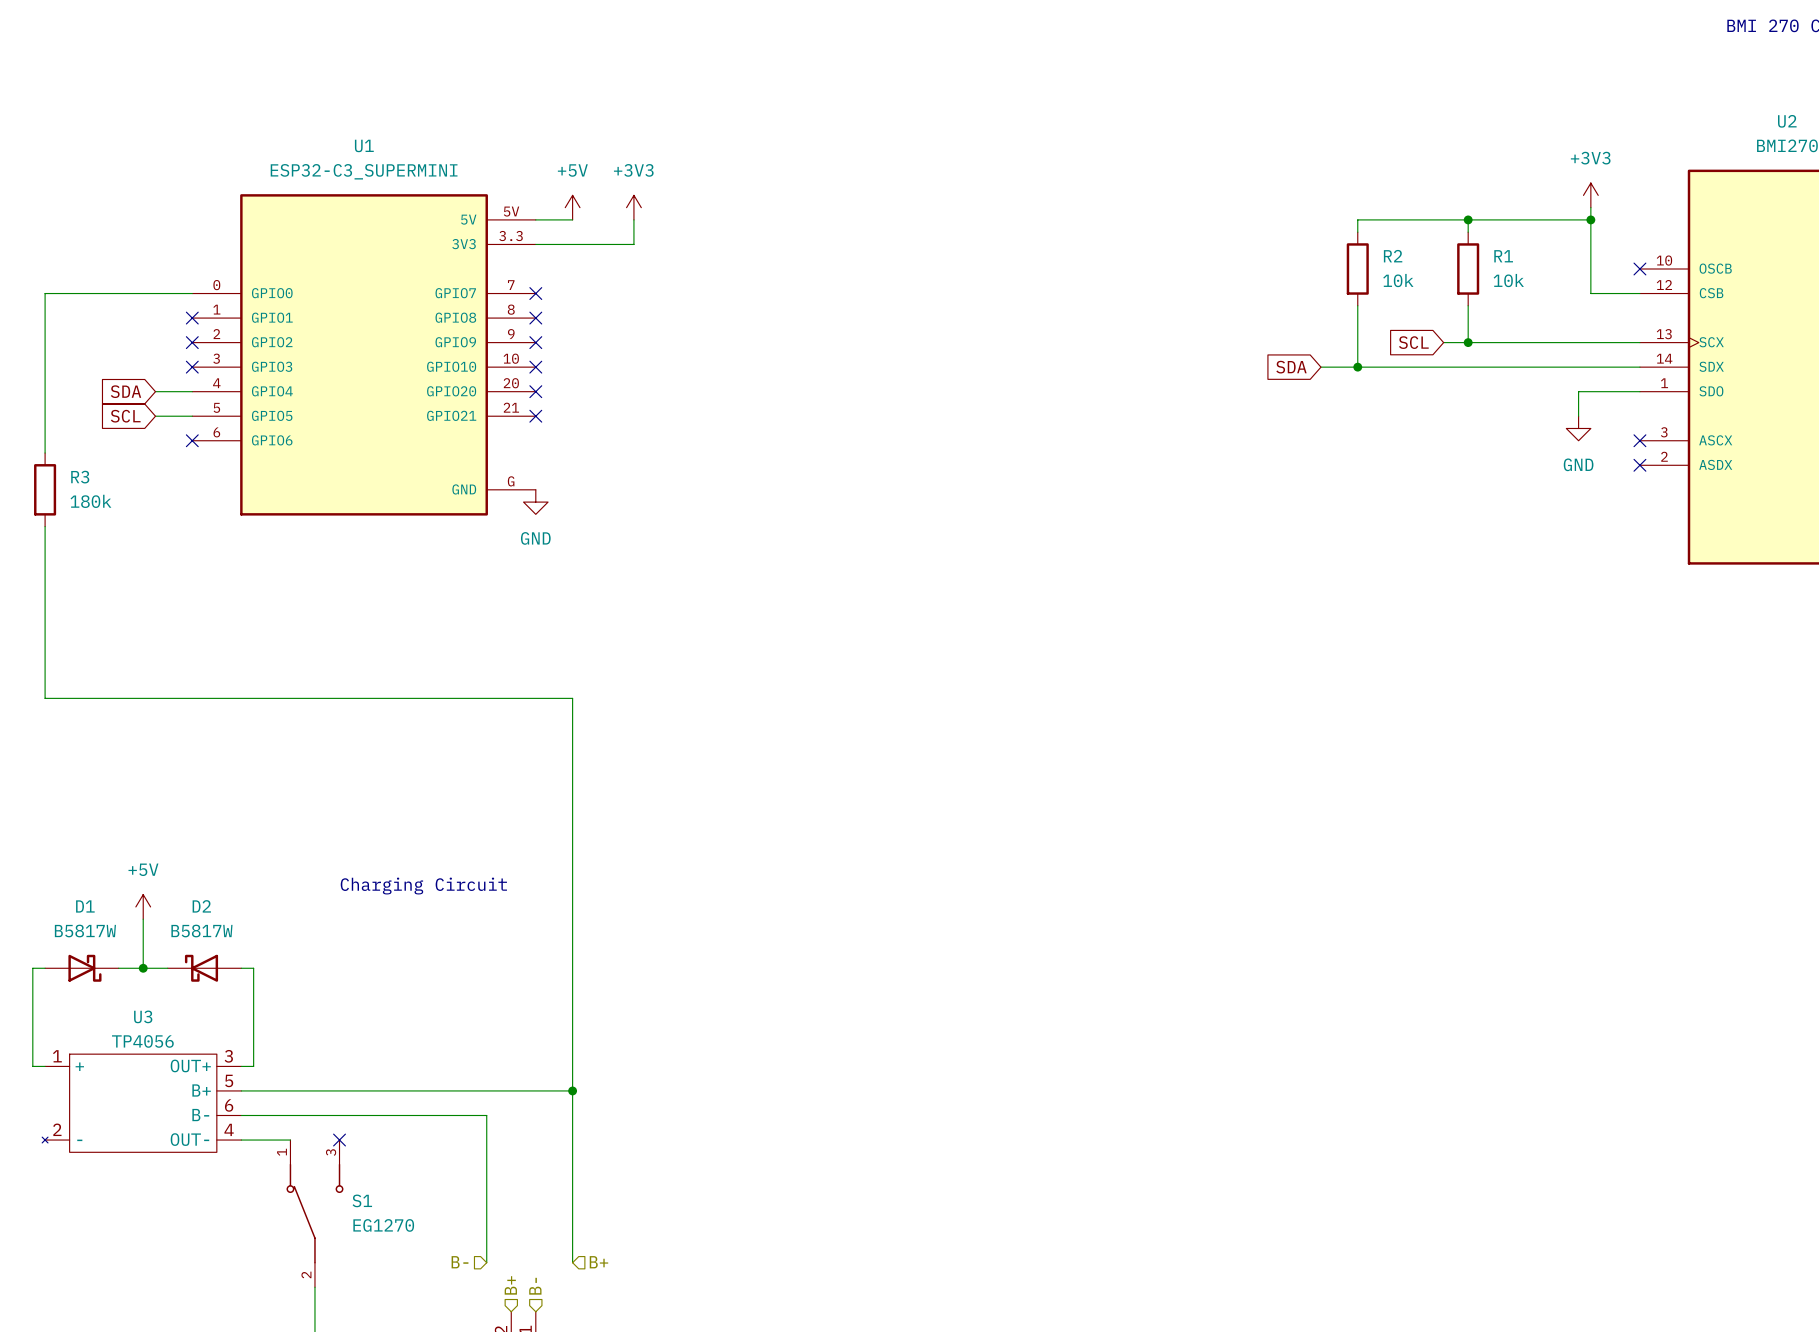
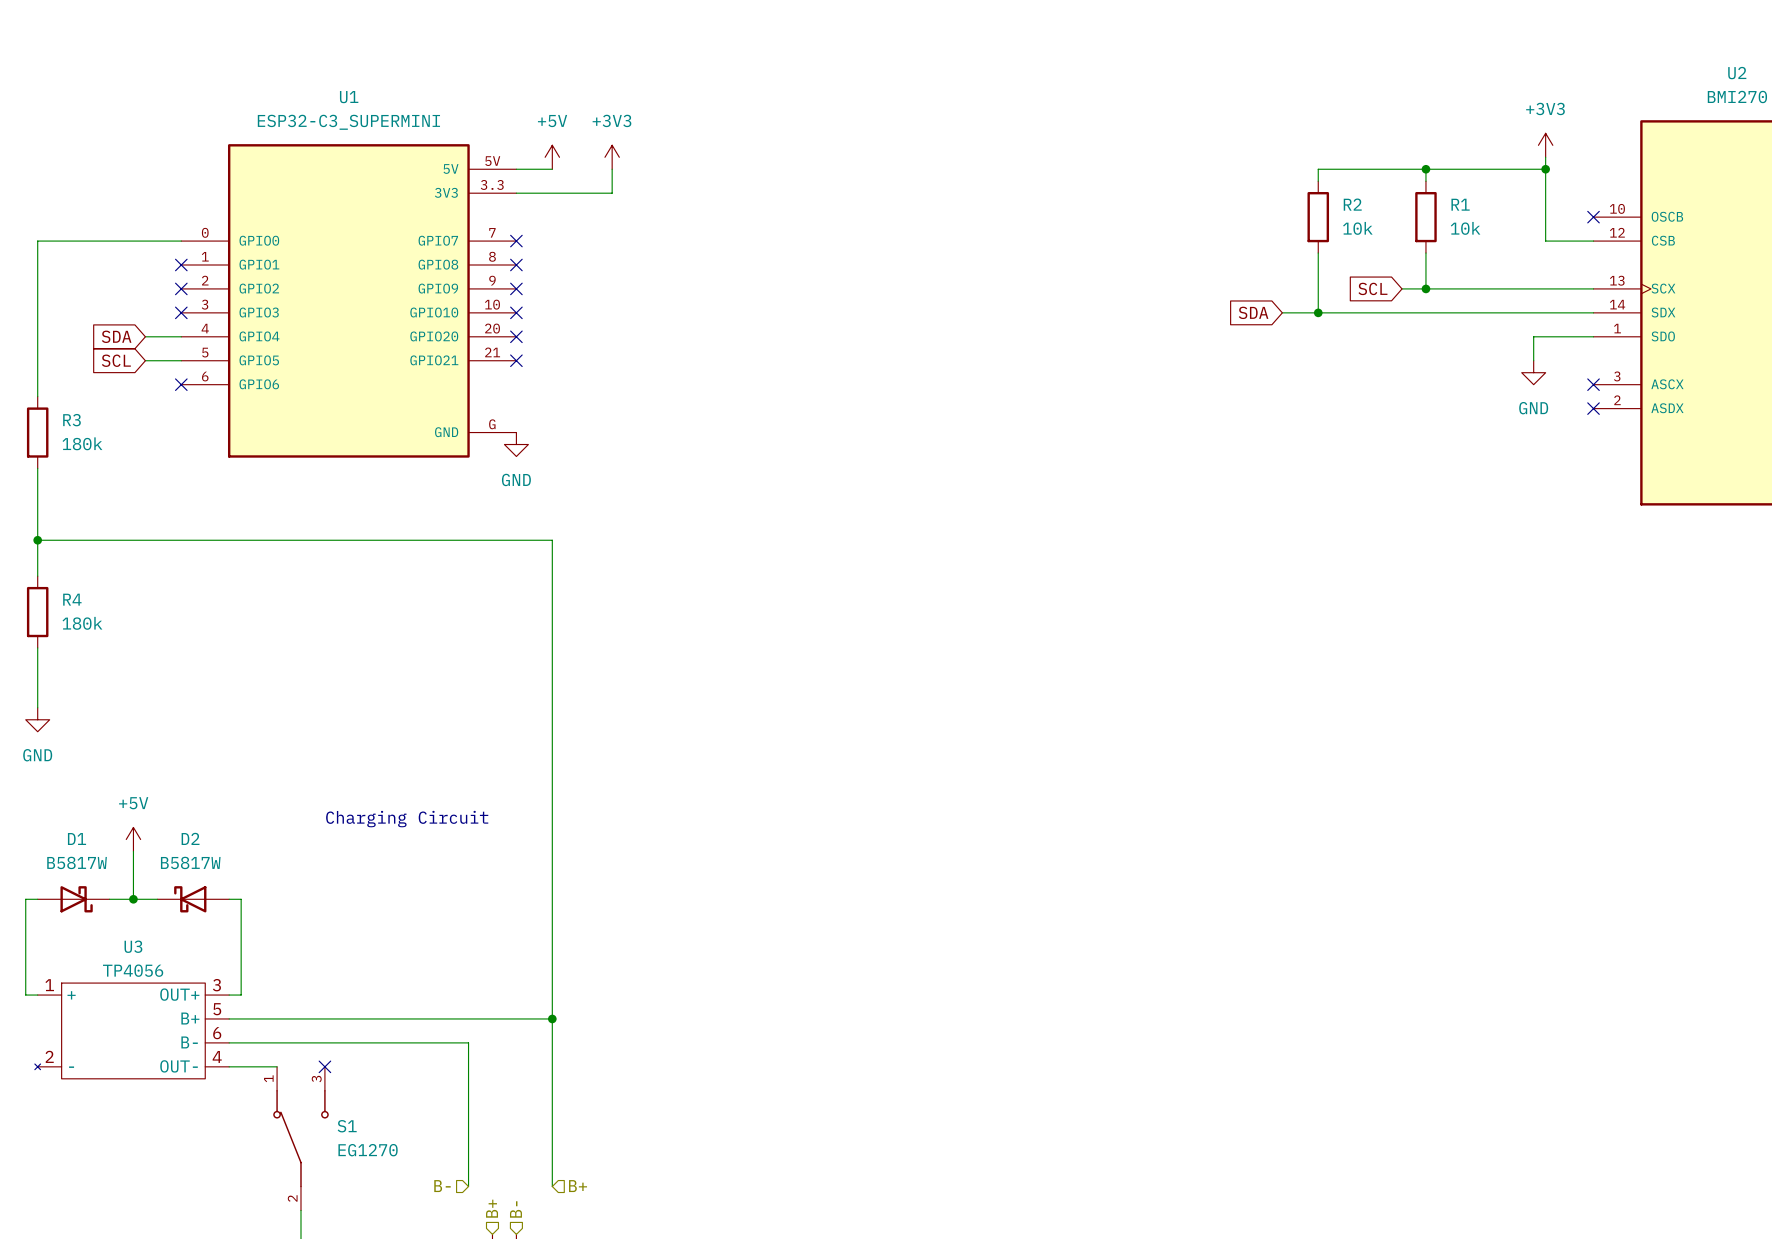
junction: none -> (37, 540)
wire: (45, 637) (45, 698) (572, 698) -> (37, 540) (552, 540) (552, 636)
R4: none -> 180k (37, 612)
wire: none -> (37, 647) (37, 707)
power symbol: none -> GND (37, 719)

